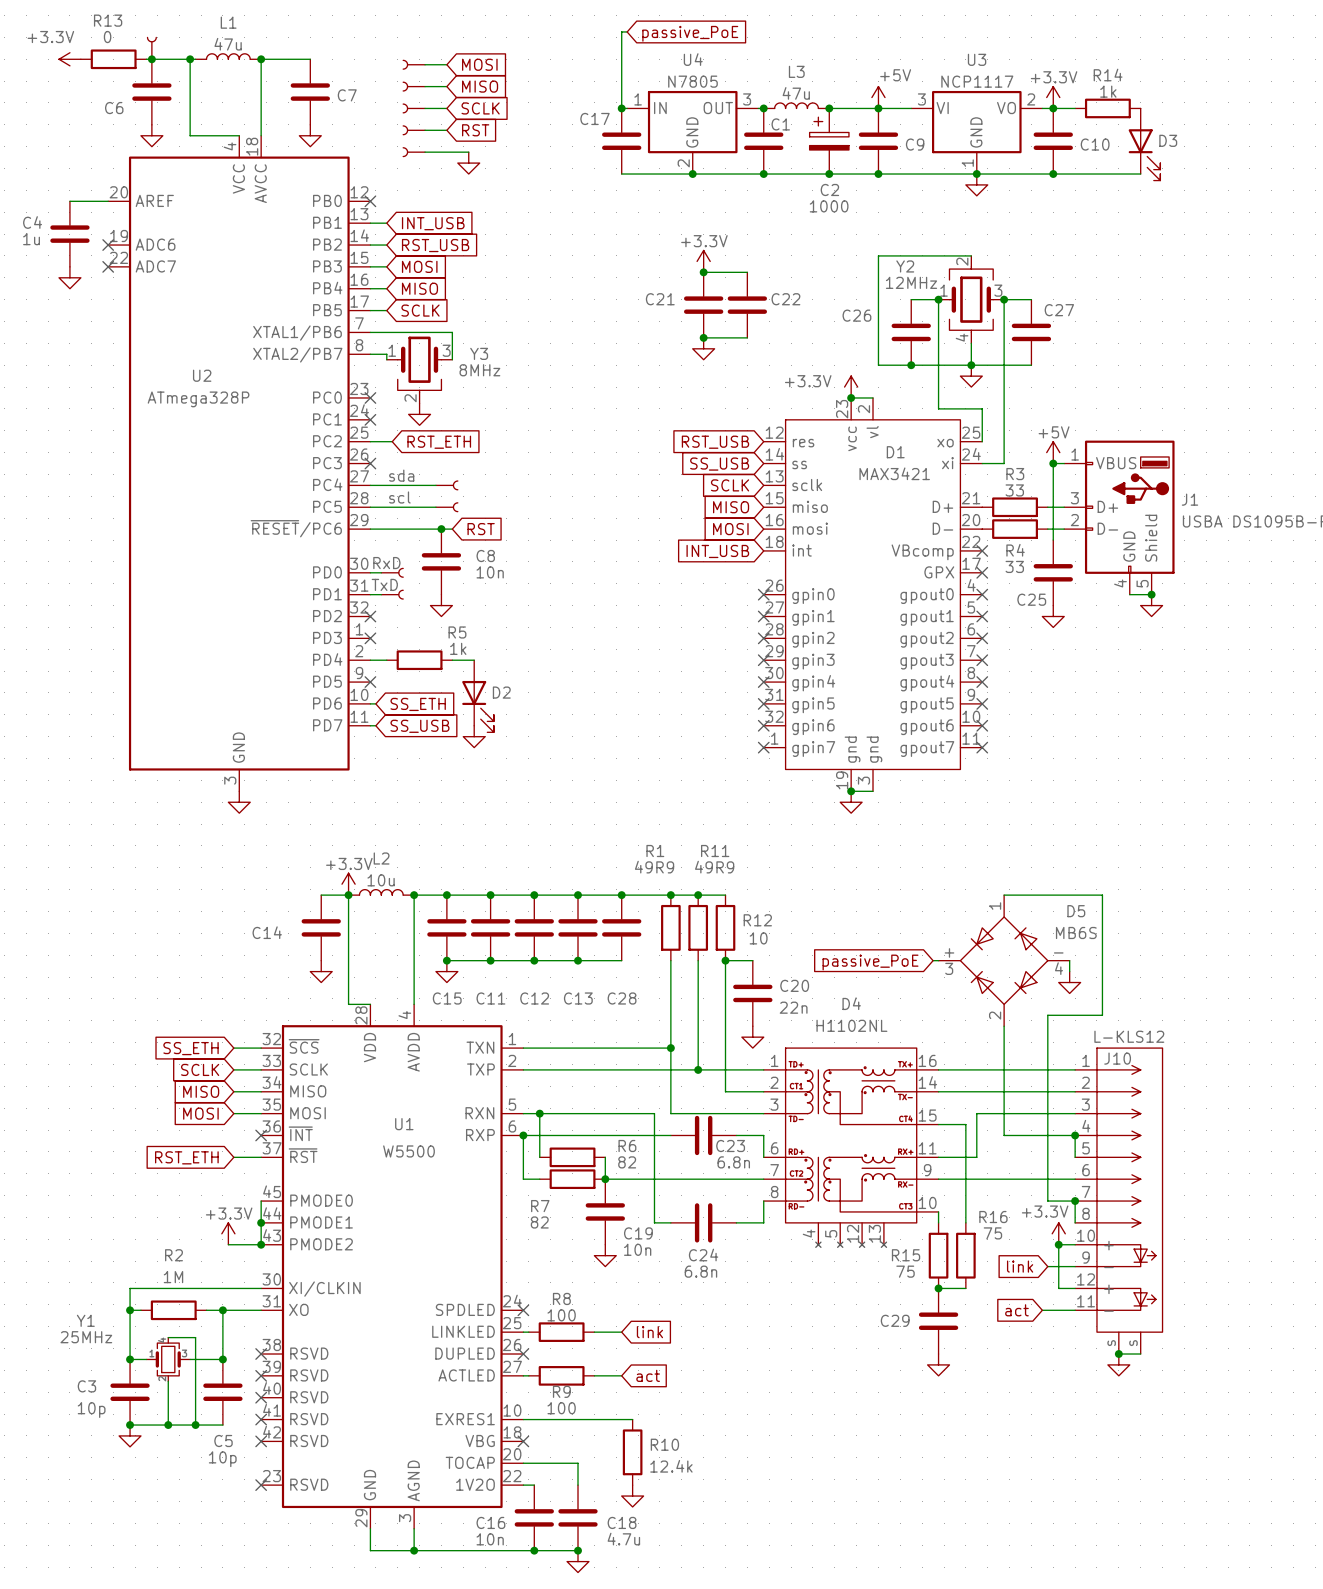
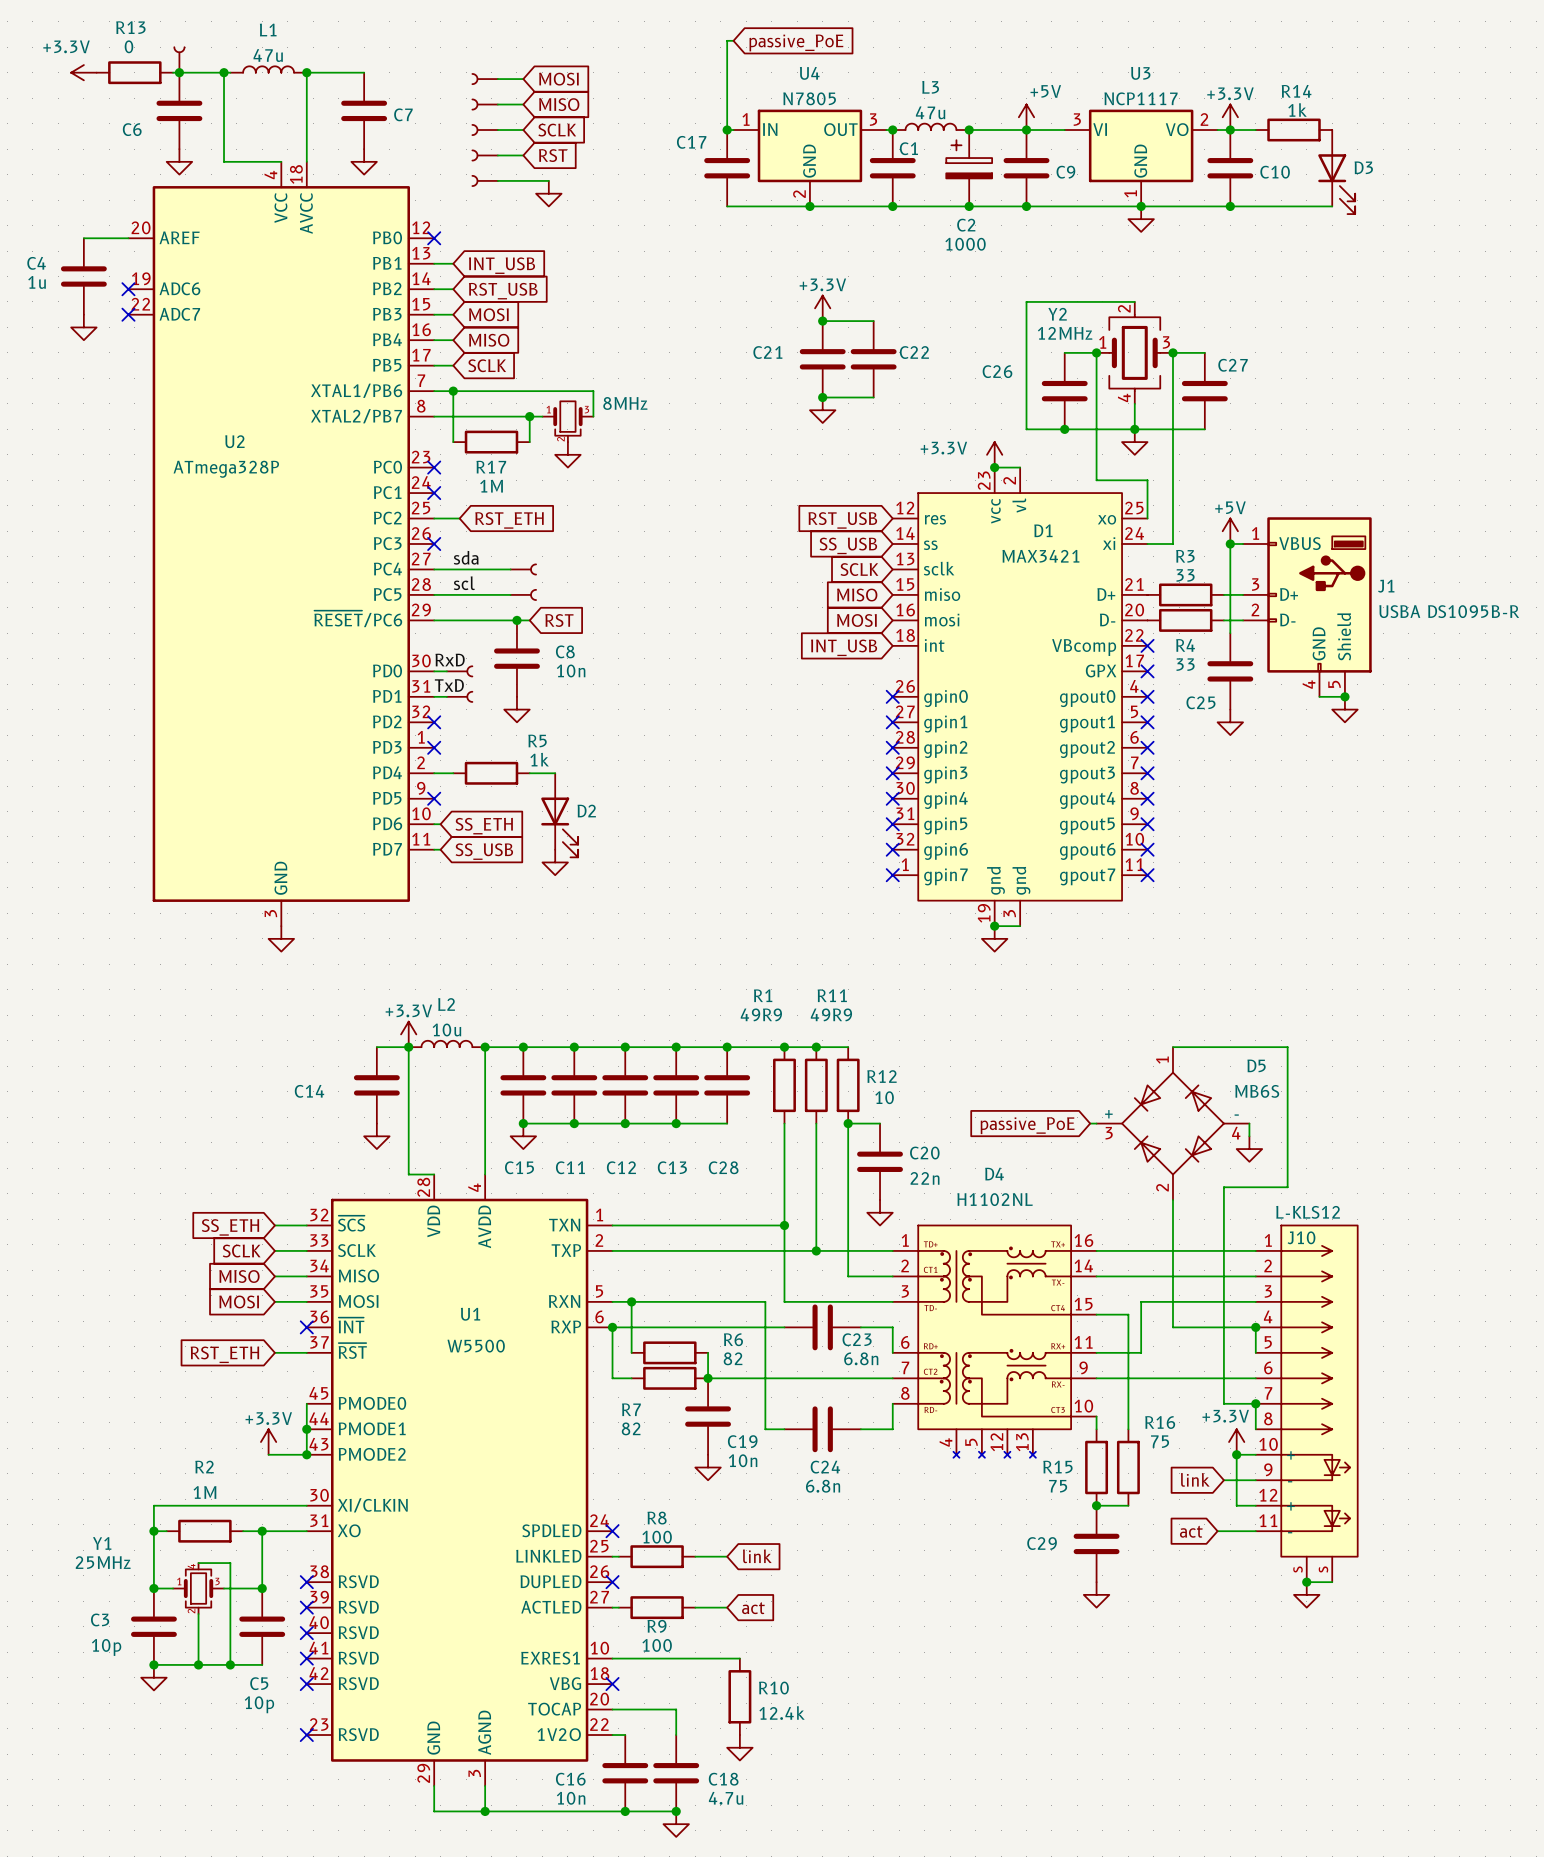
wire: none -> (453, 391) (453, 416) (542, 416)
junction: none -> (453, 391)
wire: (452, 332) (452, 354) -> (529, 391) (593, 391) (593, 416)
junction: none -> (529, 416)
part: none -> 8MHz (567, 421)
wire: none -> (453, 422) (453, 442)
wire: none -> (529, 422) (529, 442)
Y3: 8MHz (419, 370) -> none
R17: none -> 1M (491, 442)
power symbol position: (419, 414) -> (567, 454)

